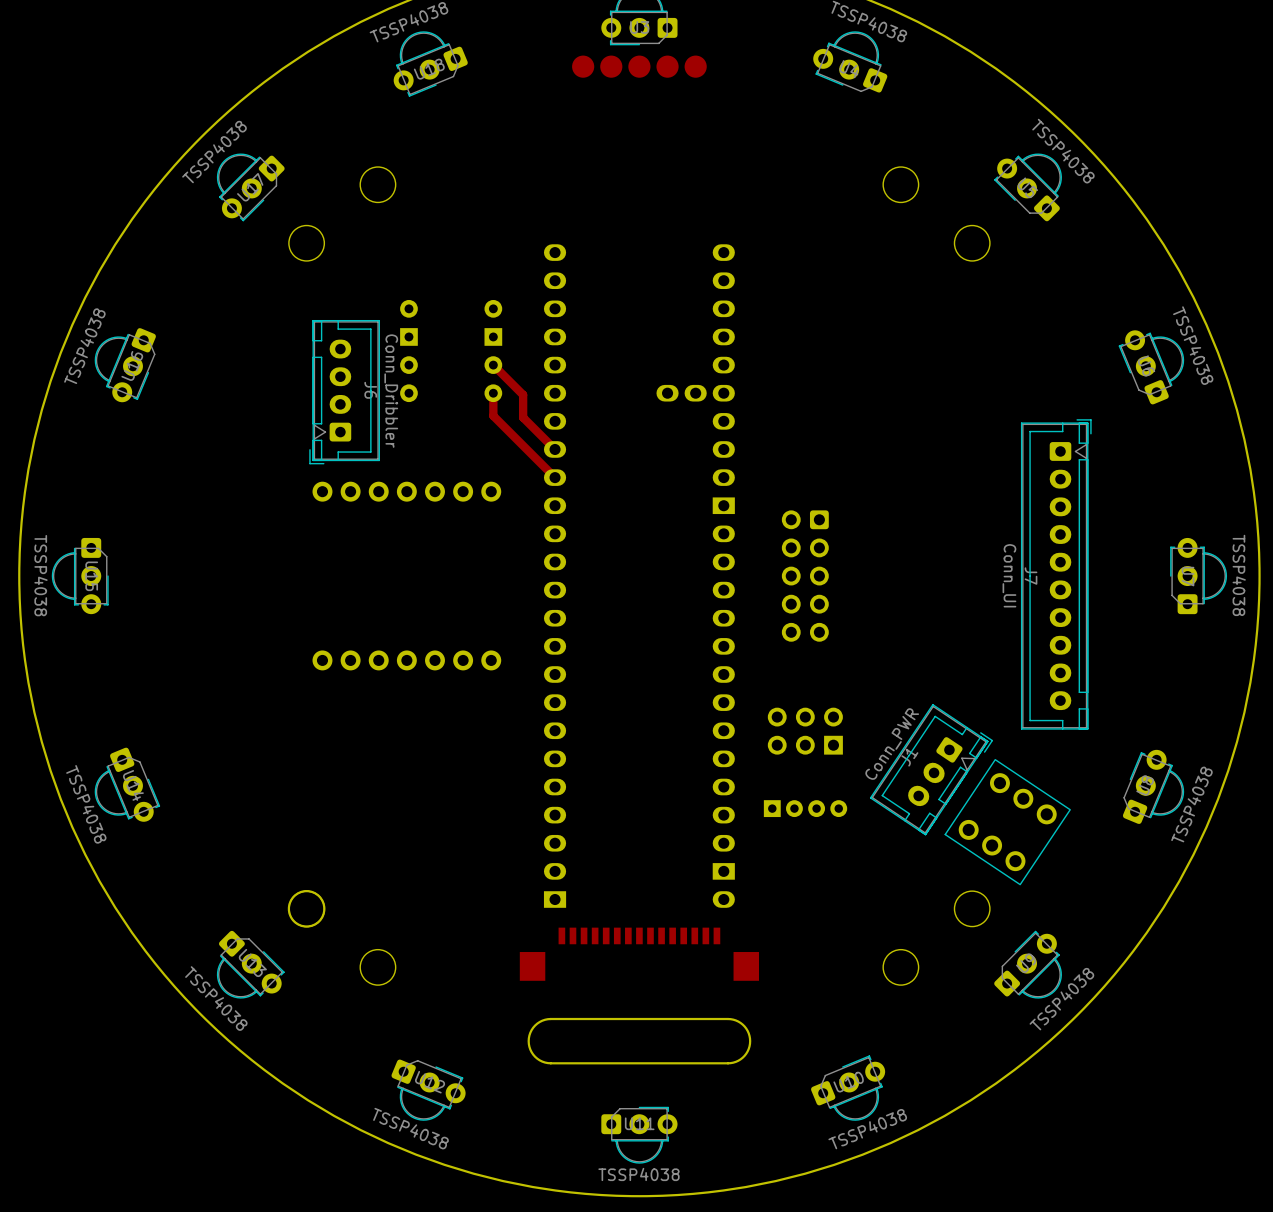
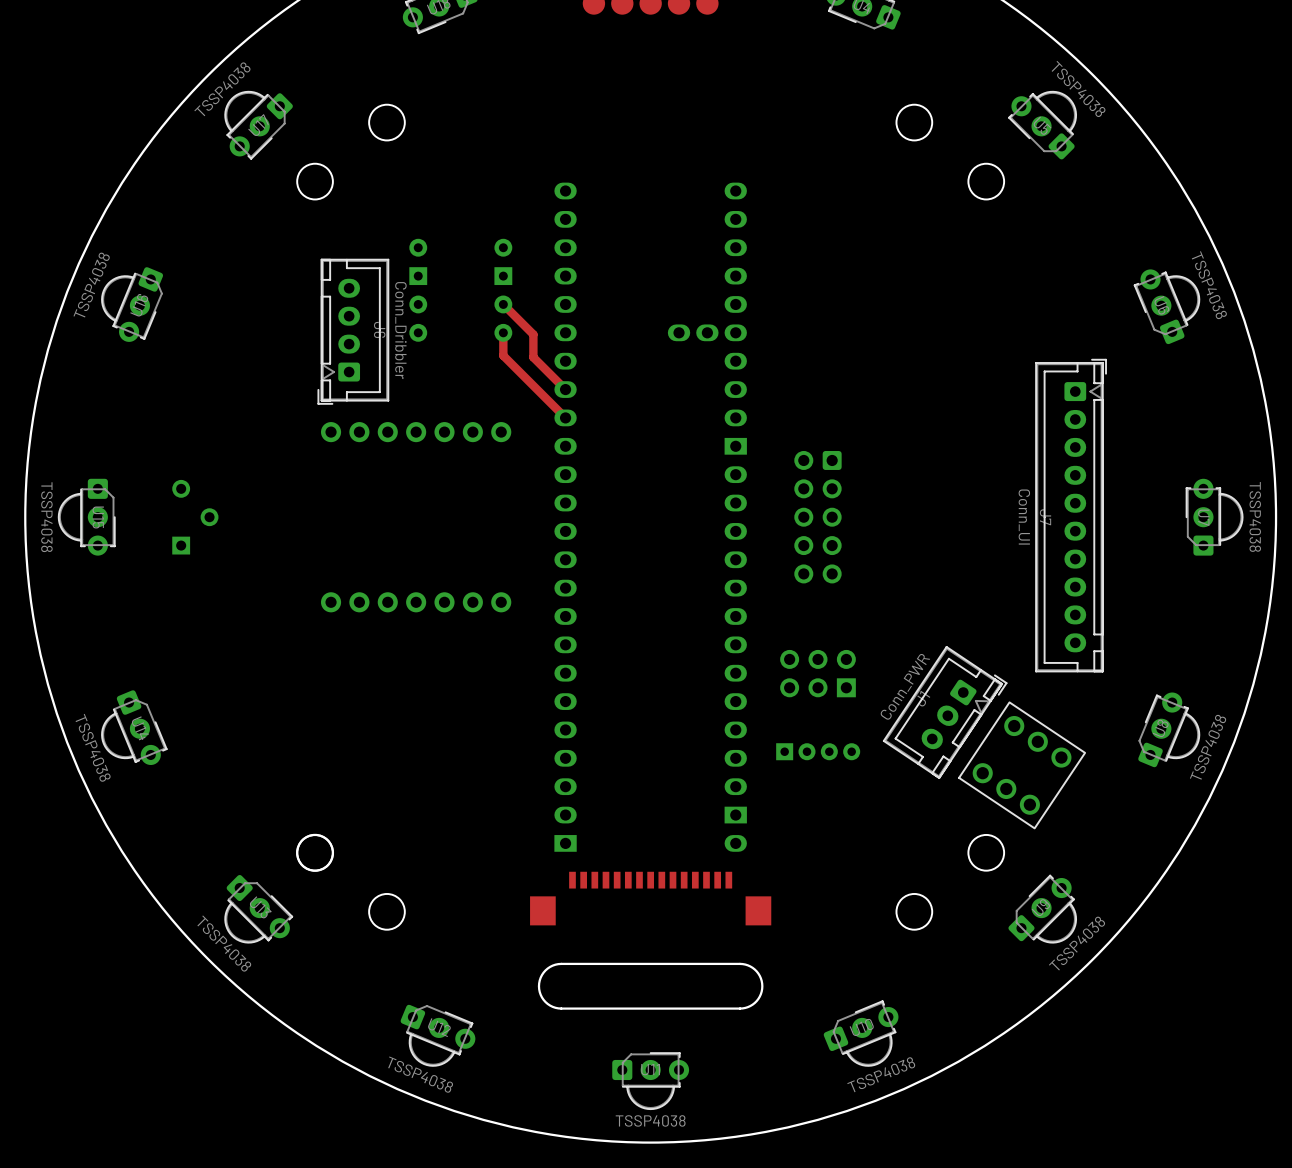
part: none -> (195, 517)

